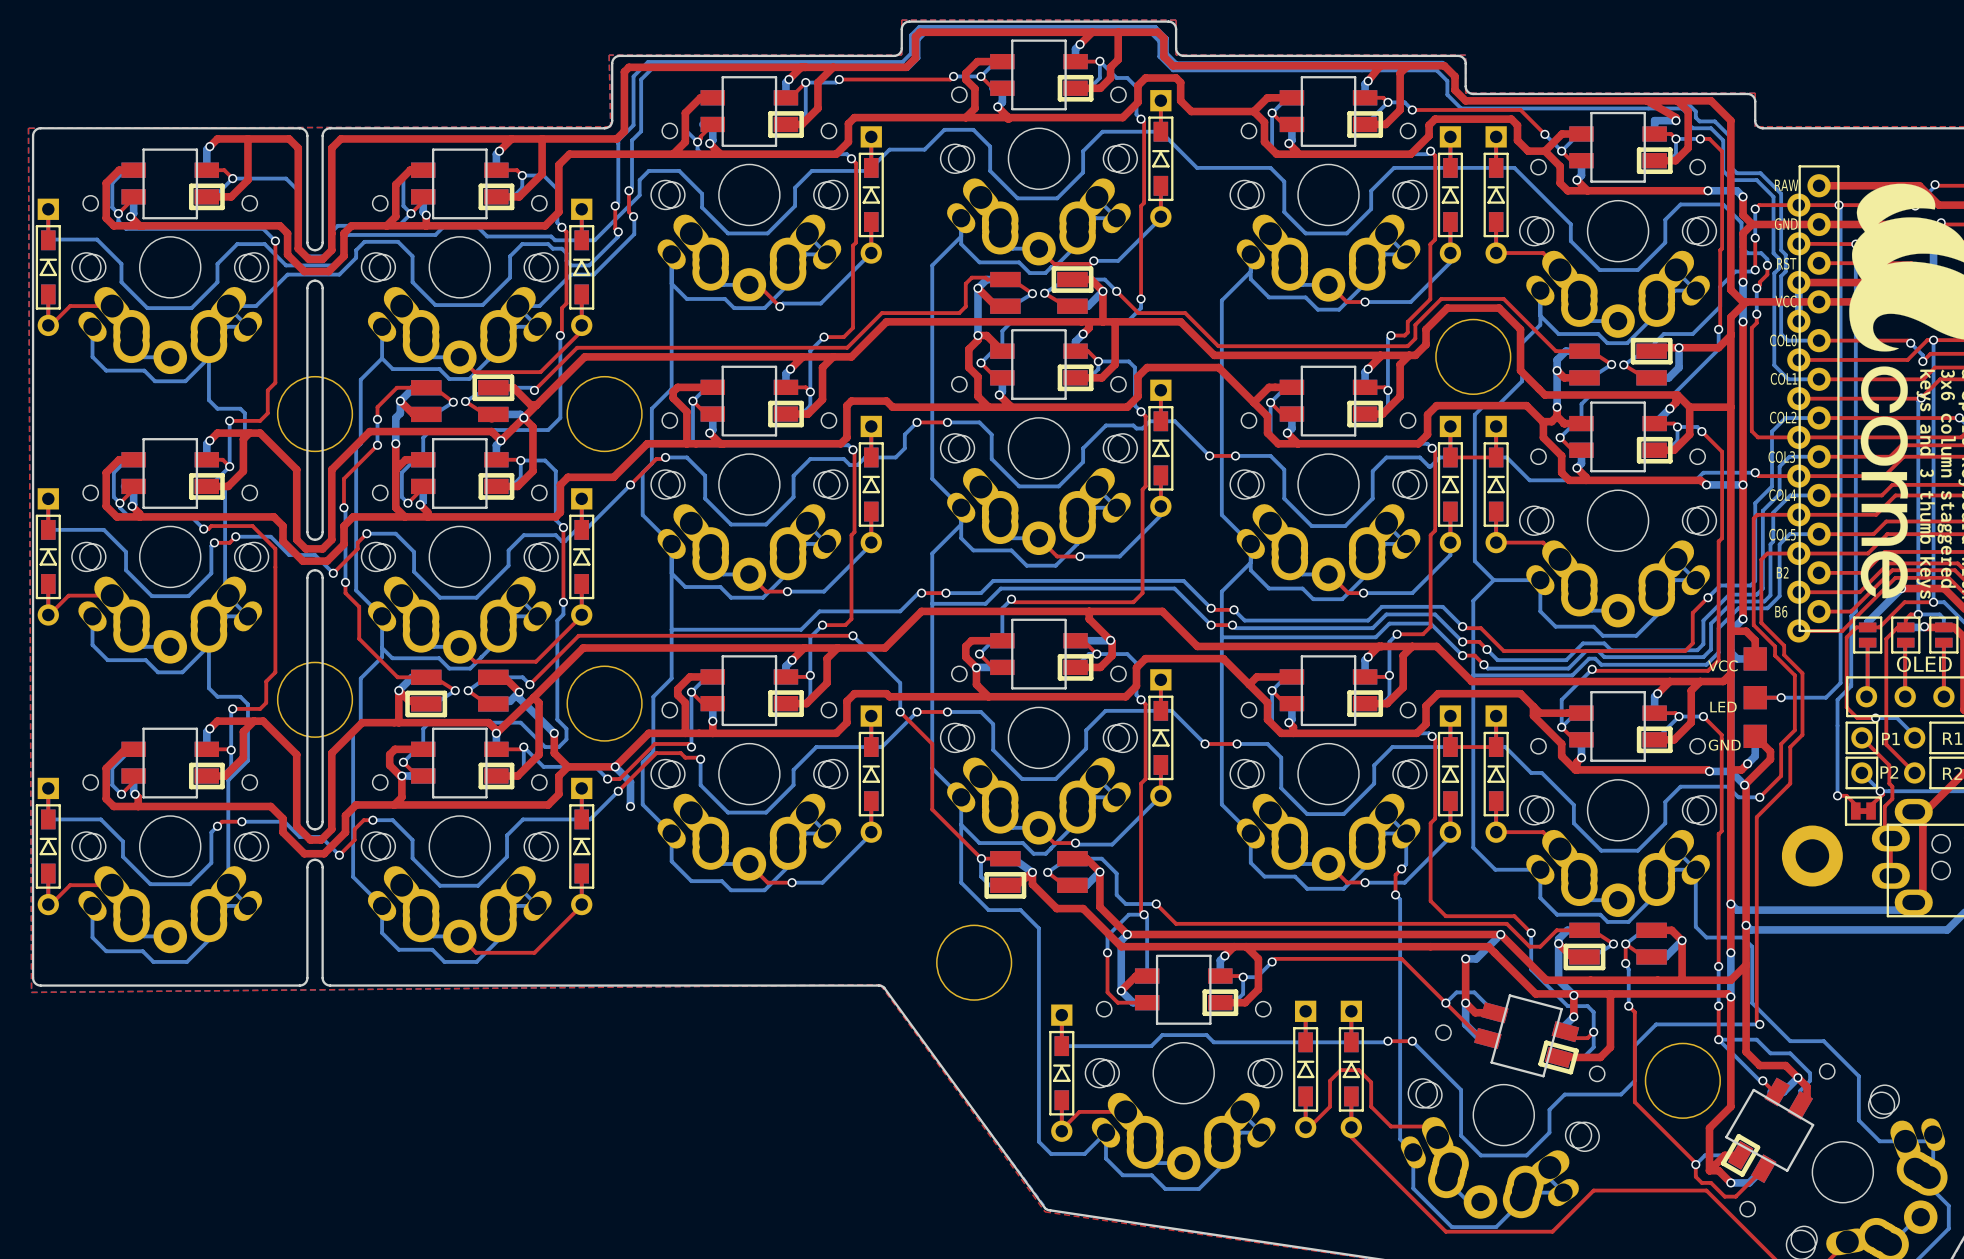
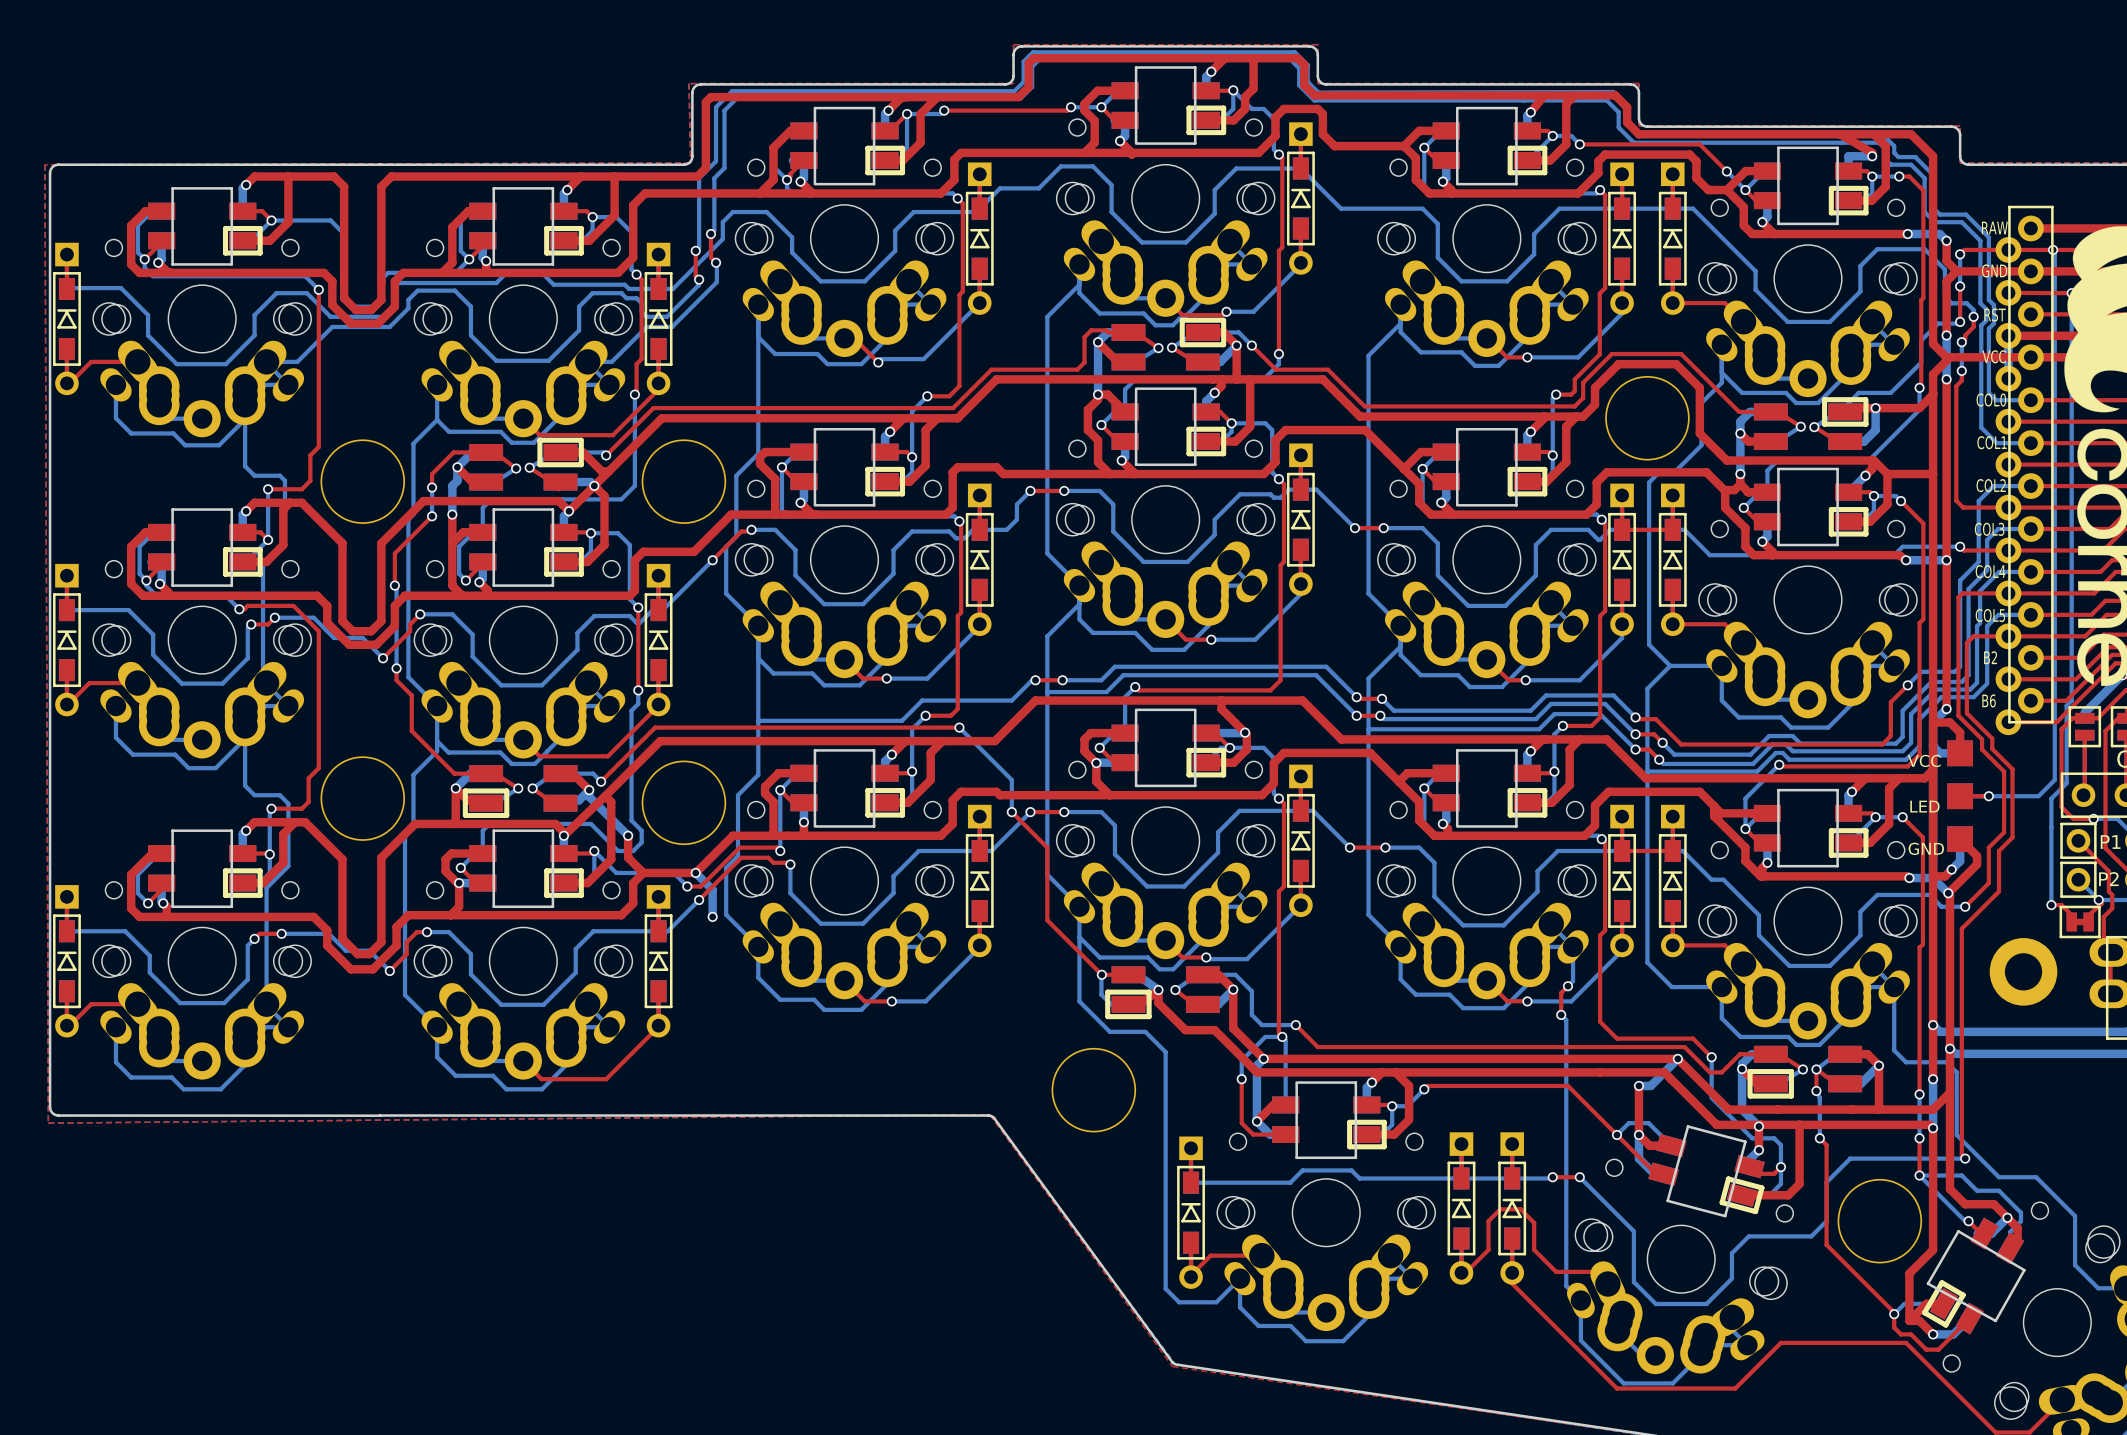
board edge: (299, 128) (304, 129) (307, 134) (307, 243) (310, 248) (315, 250) (319, 248) (322, 243) (322, 134) (325, 129) (330, 128) -> (345, 164) (379, 164)
board edge: (315, 280) (320, 282) (322, 288) (322, 532) (320, 537) (315, 539) (309, 537) (307, 532) (307, 288) (309, 282) (315, 280) -> none
board edge: (315, 570) (309, 572) (307, 577) (307, 821) (309, 827) (315, 829) (320, 827) (322, 821) (322, 577) (320, 572) (315, 570) -> none
board edge: (40, 985) (302, 984) (307, 977) (307, 866) (310, 861) (315, 859) (319, 861) (322, 866) (322, 977) (324, 983) (330, 985) -> (58, 1115) (380, 1115)

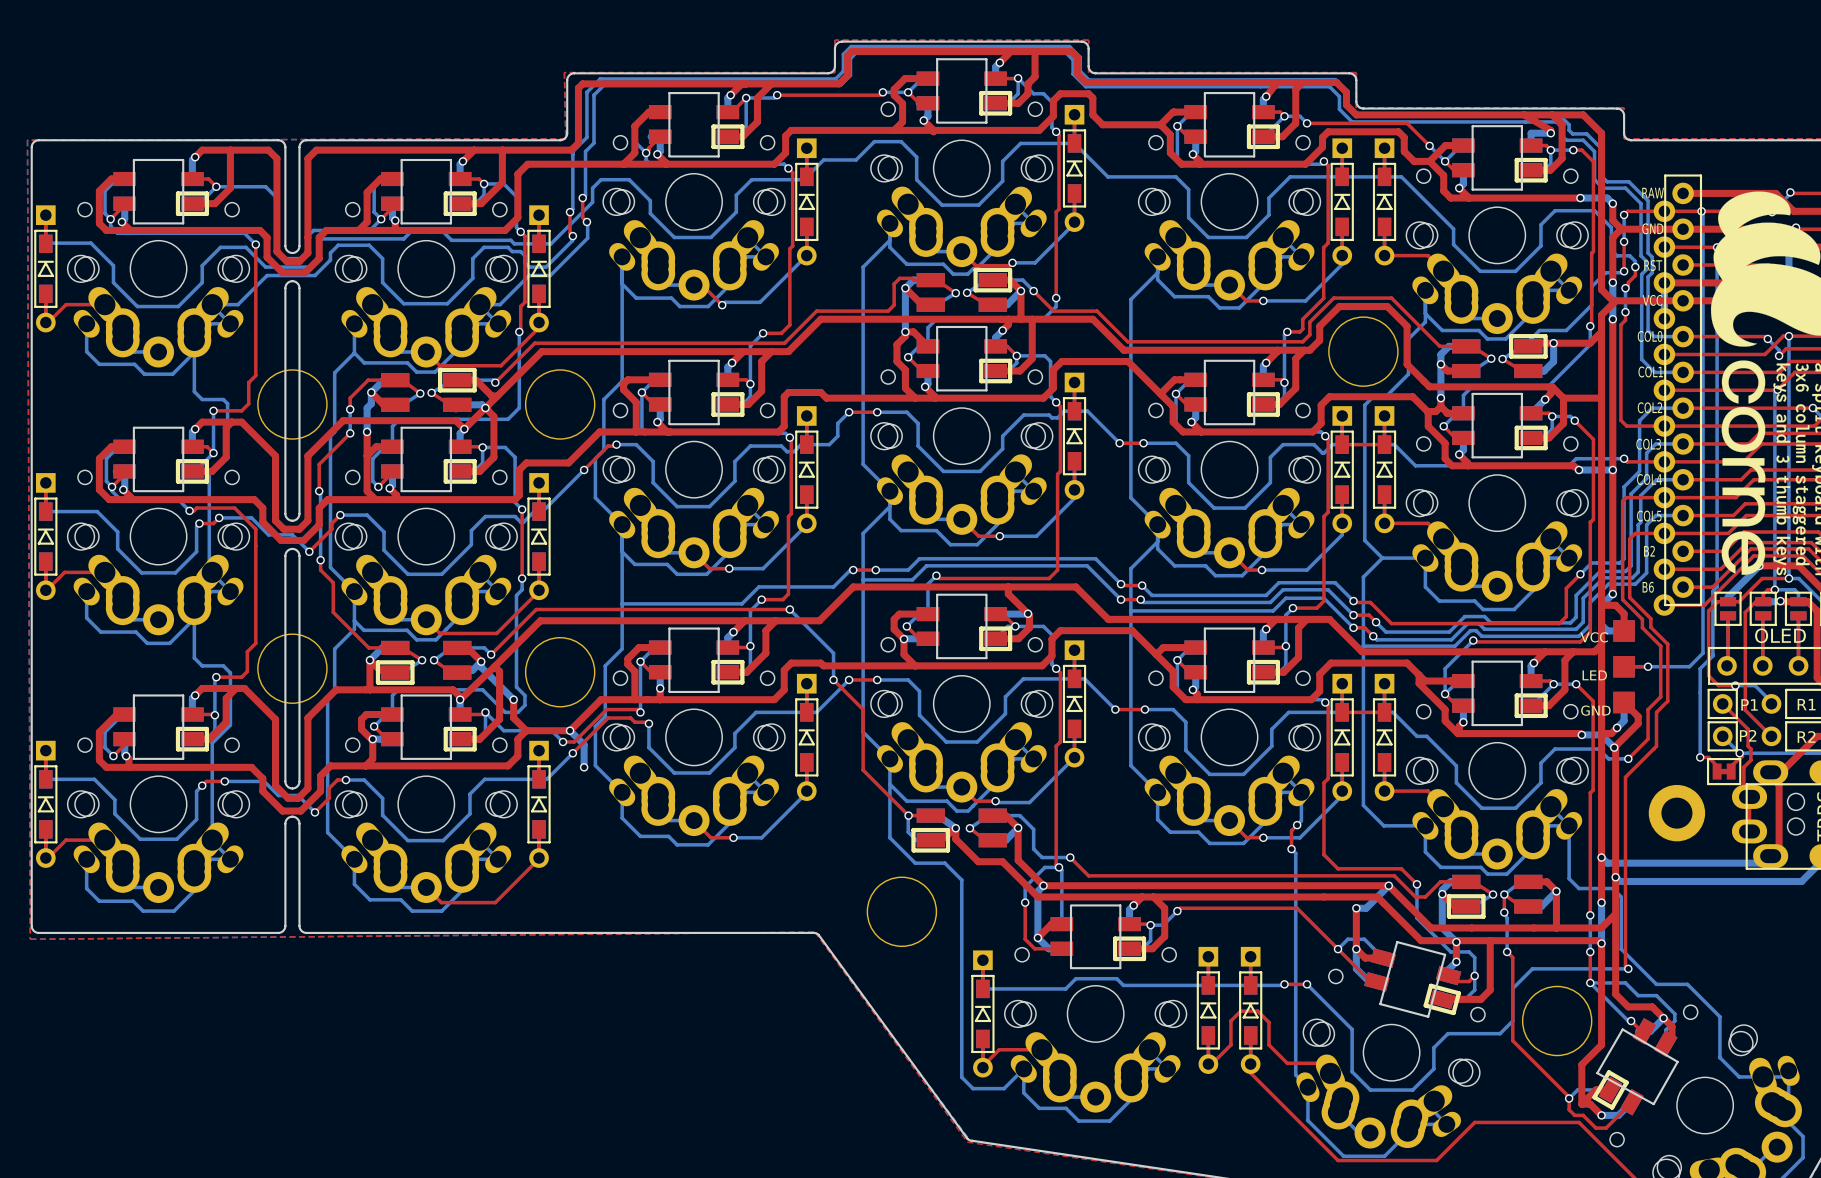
board edge: (345, 164) (379, 164) -> (278, 140) (282, 141) (285, 146) (285, 246) (288, 251) (292, 252) (296, 251) (299, 246) (299, 146) (302, 141) (306, 140)
board edge: none -> (292, 281) (297, 283) (299, 288) (299, 513) (297, 518) (292, 520) (287, 518) (285, 513) (285, 288) (287, 283) (292, 281)
board edge: none -> (292, 548) (287, 550) (285, 555) (285, 781) (287, 786) (292, 788) (297, 786) (299, 781) (299, 555) (297, 550) (292, 548)
board edge: (58, 1115) (380, 1115) -> (38, 932) (281, 932) (285, 925) (285, 822) (288, 818) (292, 816) (296, 818) (299, 822) (299, 925) (301, 930) (306, 932)

